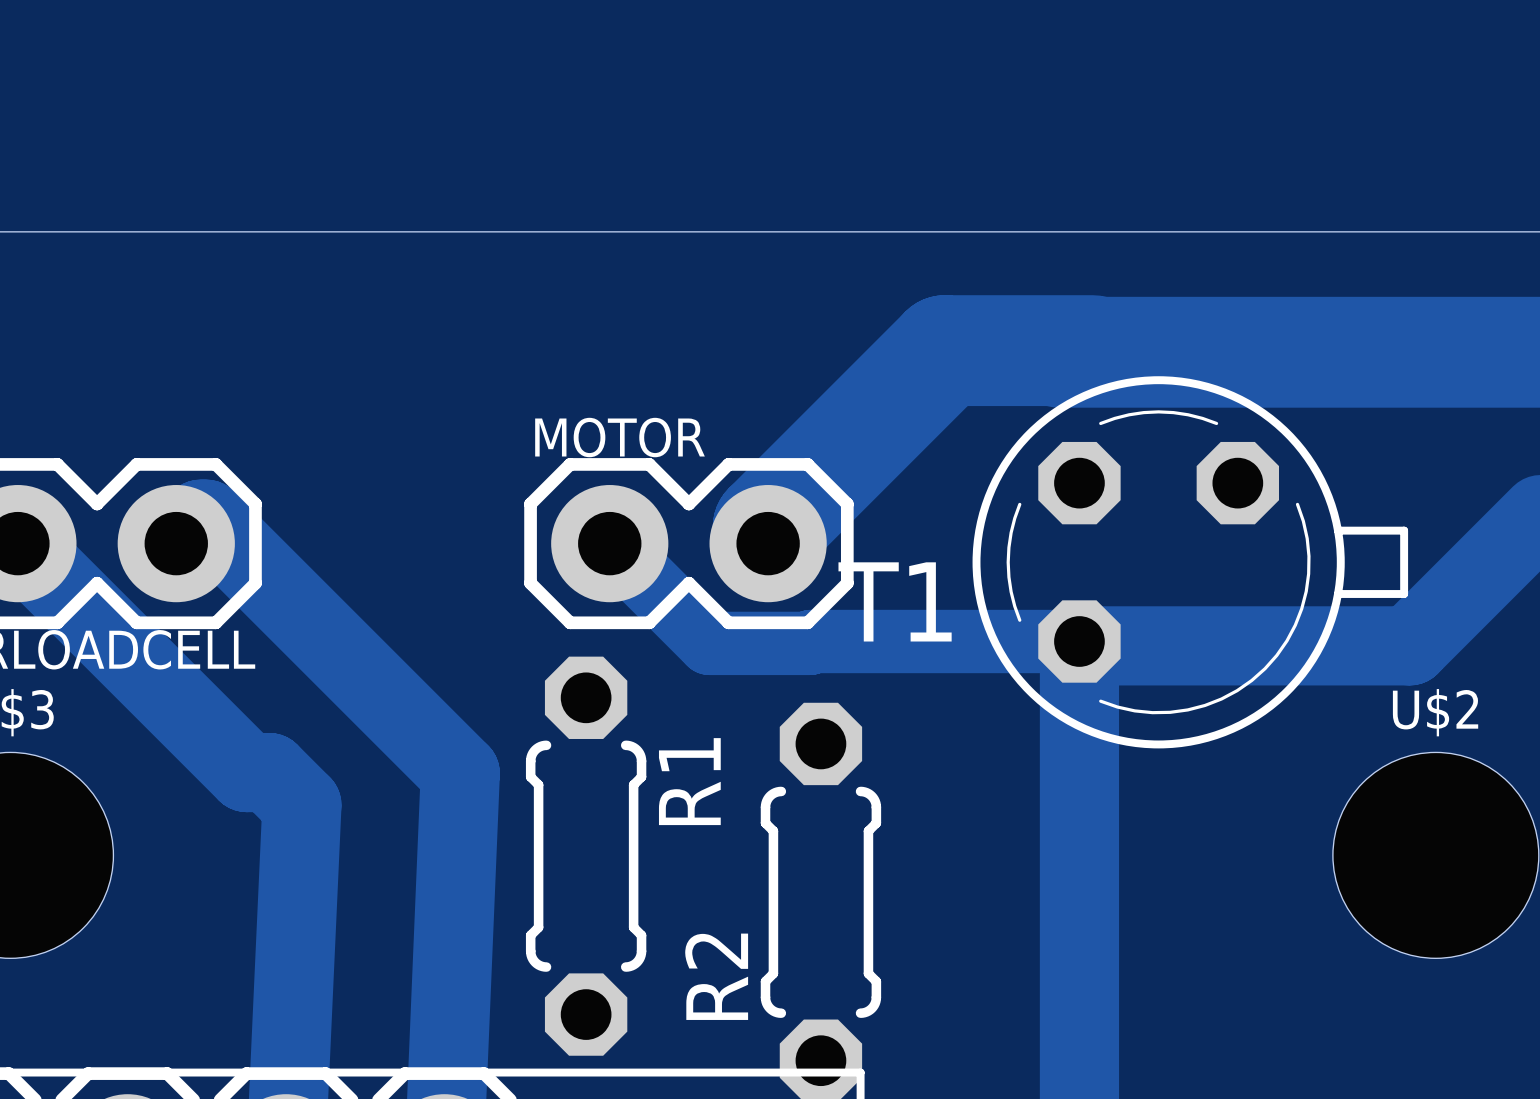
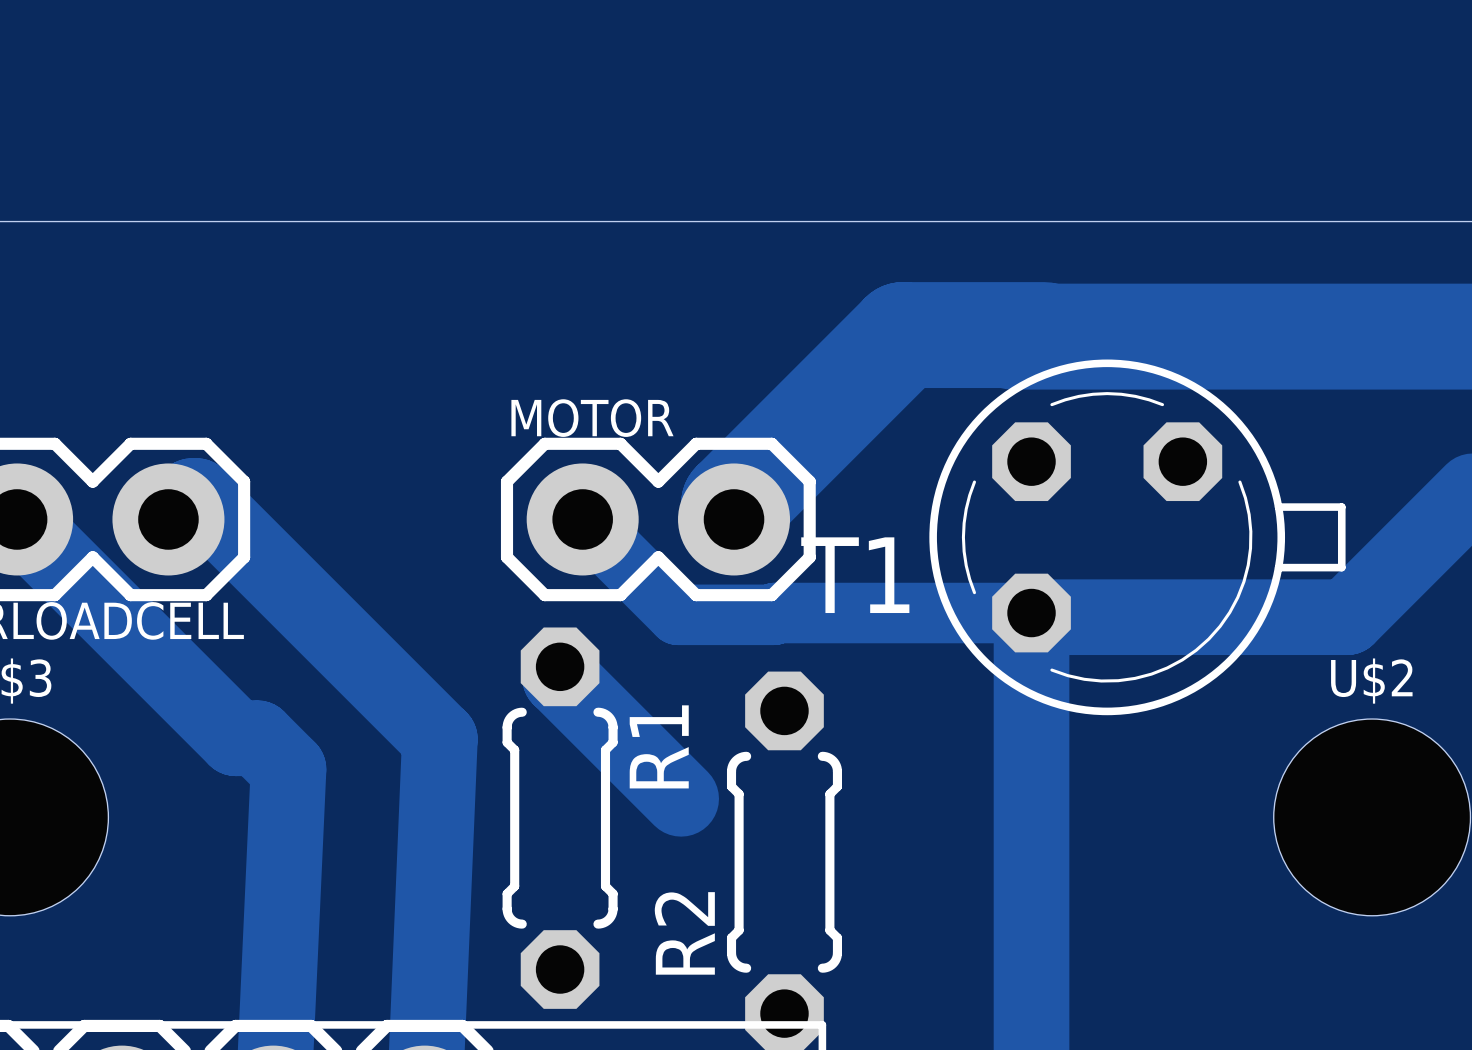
track: none -> (560, 666) (560, 677) (681, 798)

